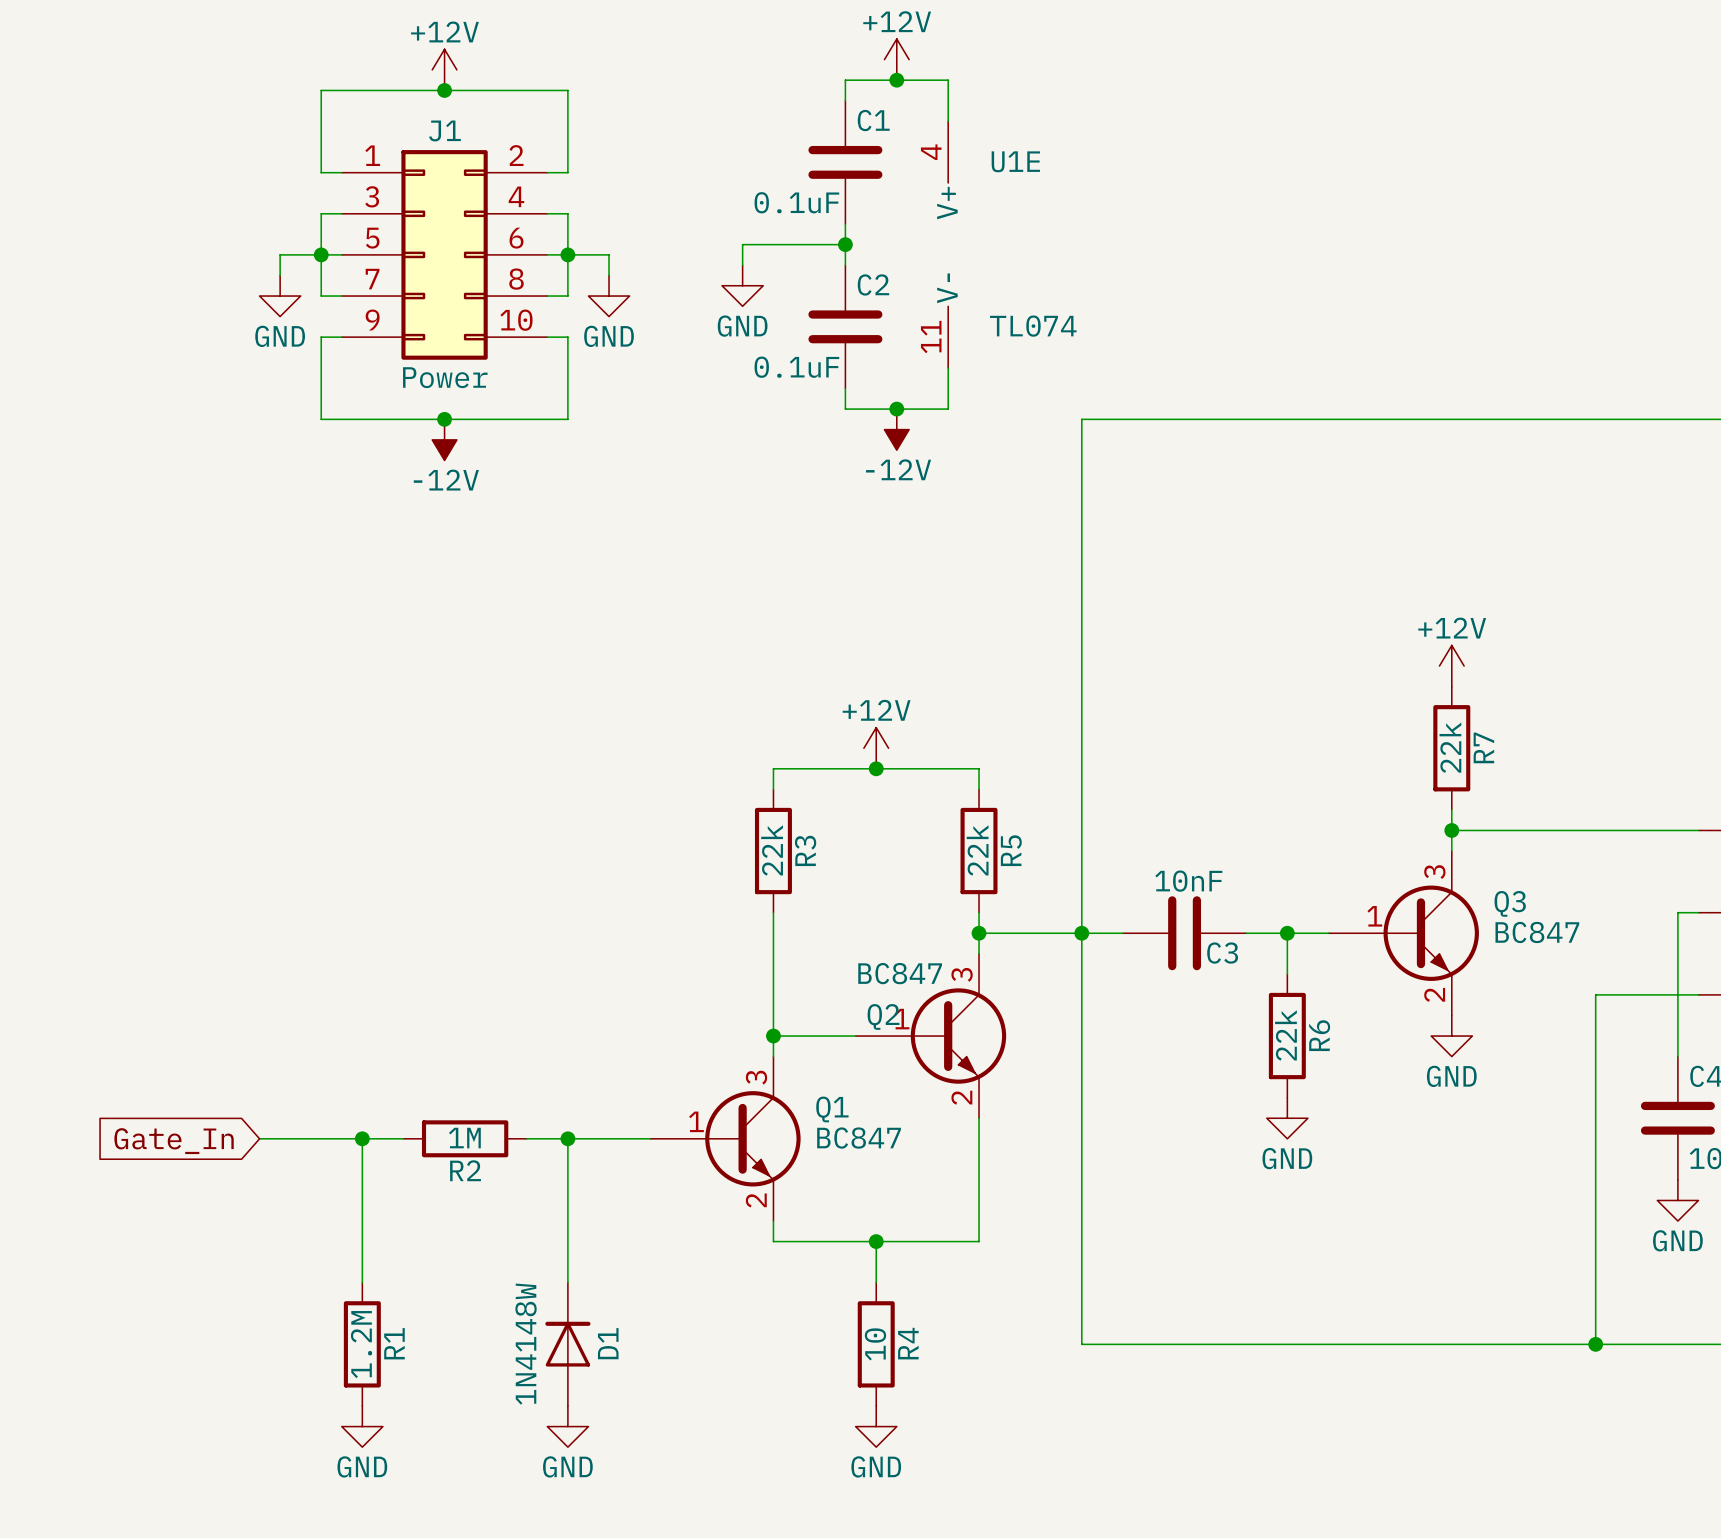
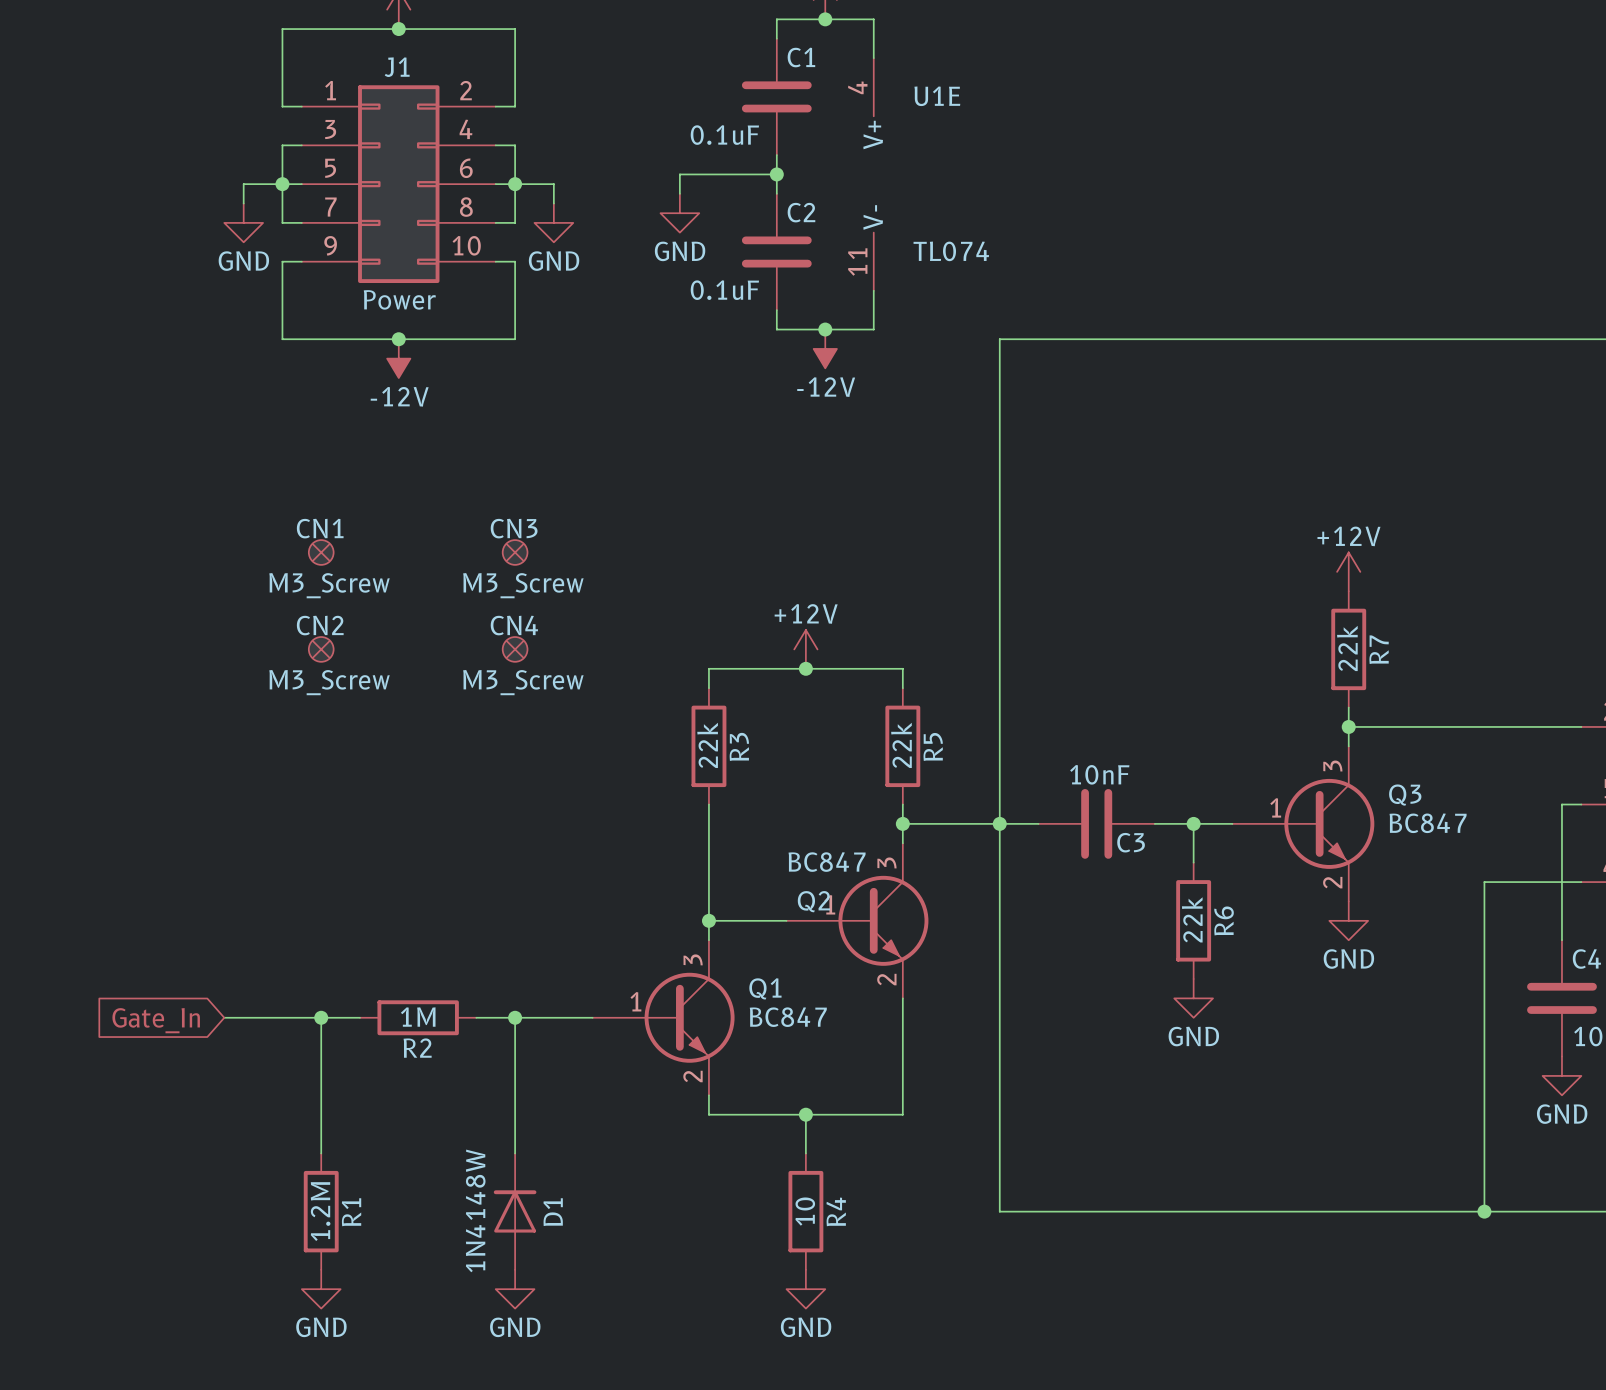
CN1: none -> M3_Screw (321, 552)
CN3: none -> M3_Screw (515, 552)
CN2: none -> M3_Screw (321, 649)
CN4: none -> M3_Screw (515, 649)

